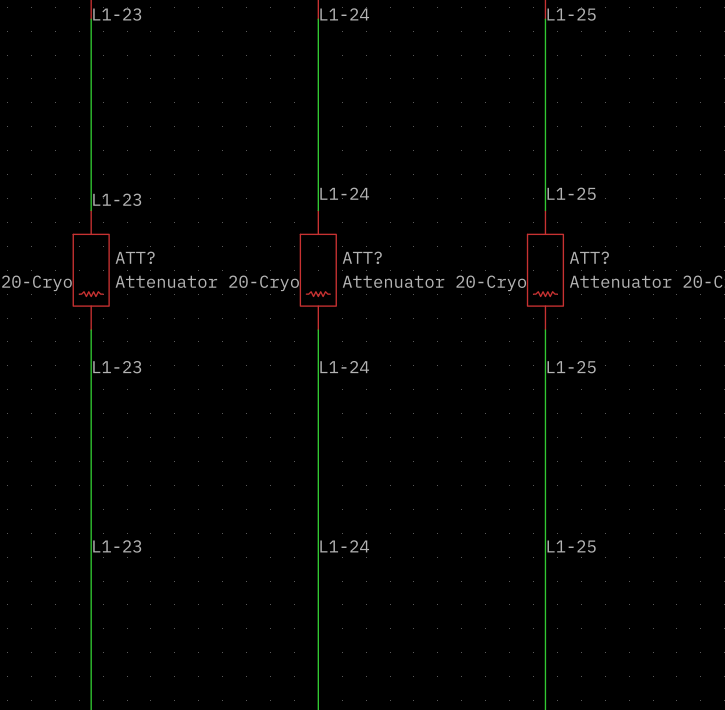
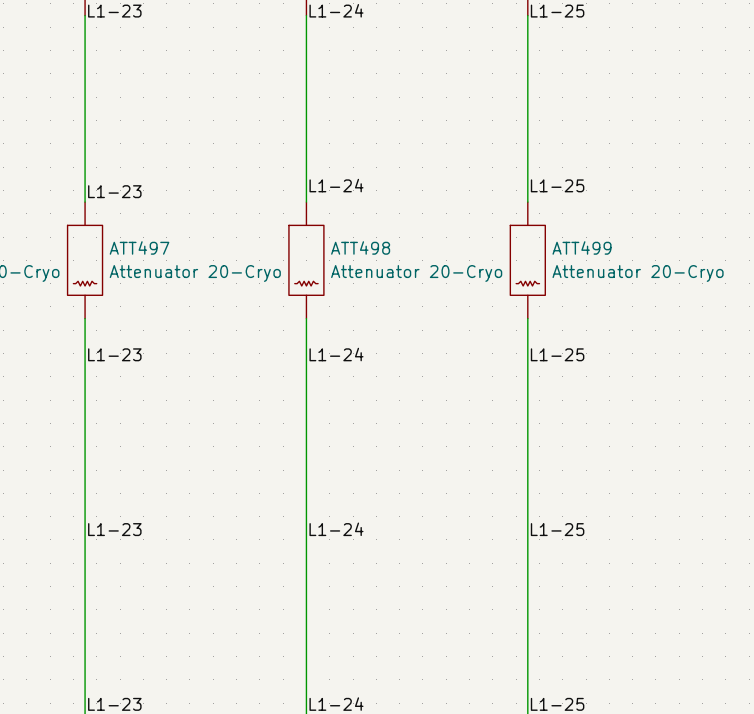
ATT? name: ATT? (135, 257) -> ATT497 (139, 247)
ATT? name: ATT? (362, 257) -> ATT498 (360, 247)
ATT? name: ATT? (589, 257) -> ATT499 (582, 247)

